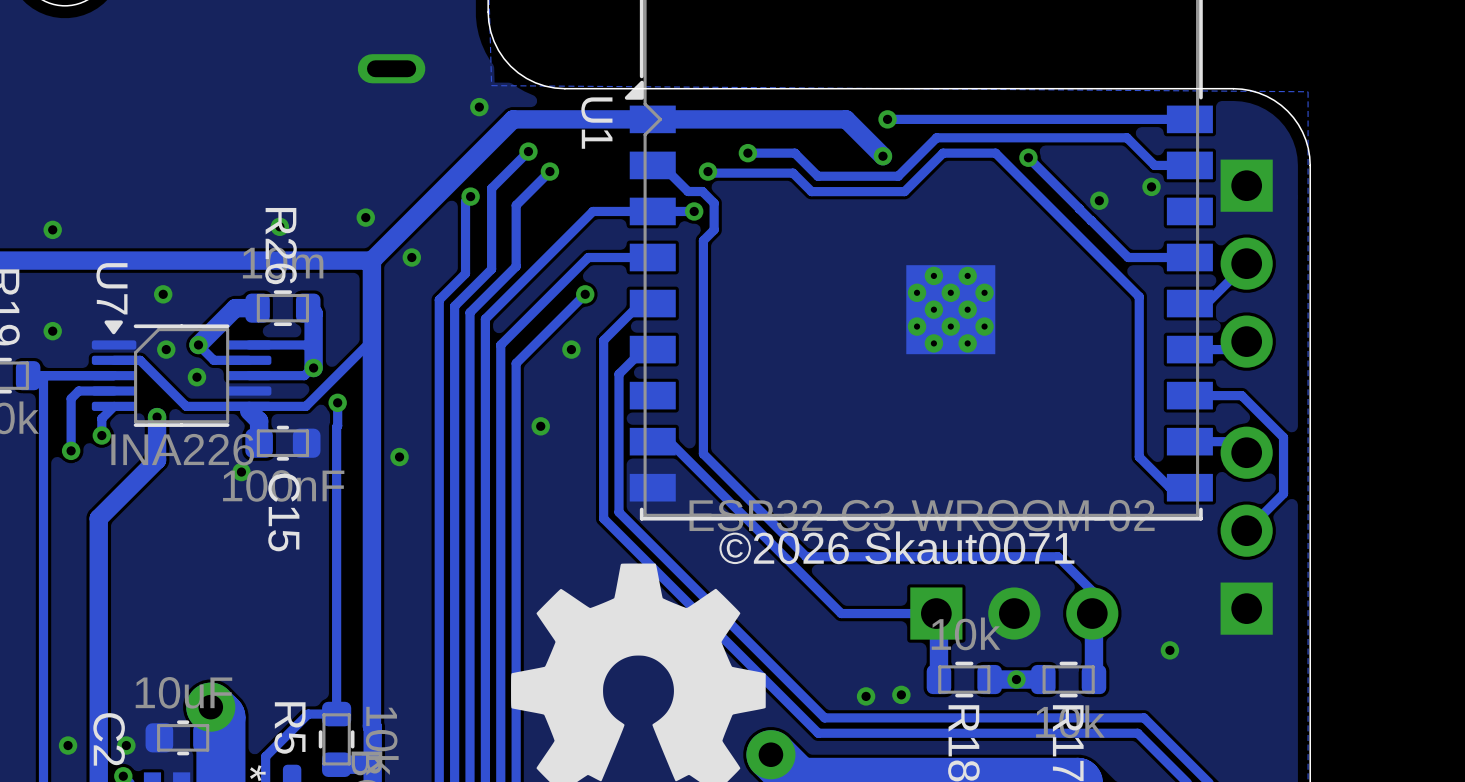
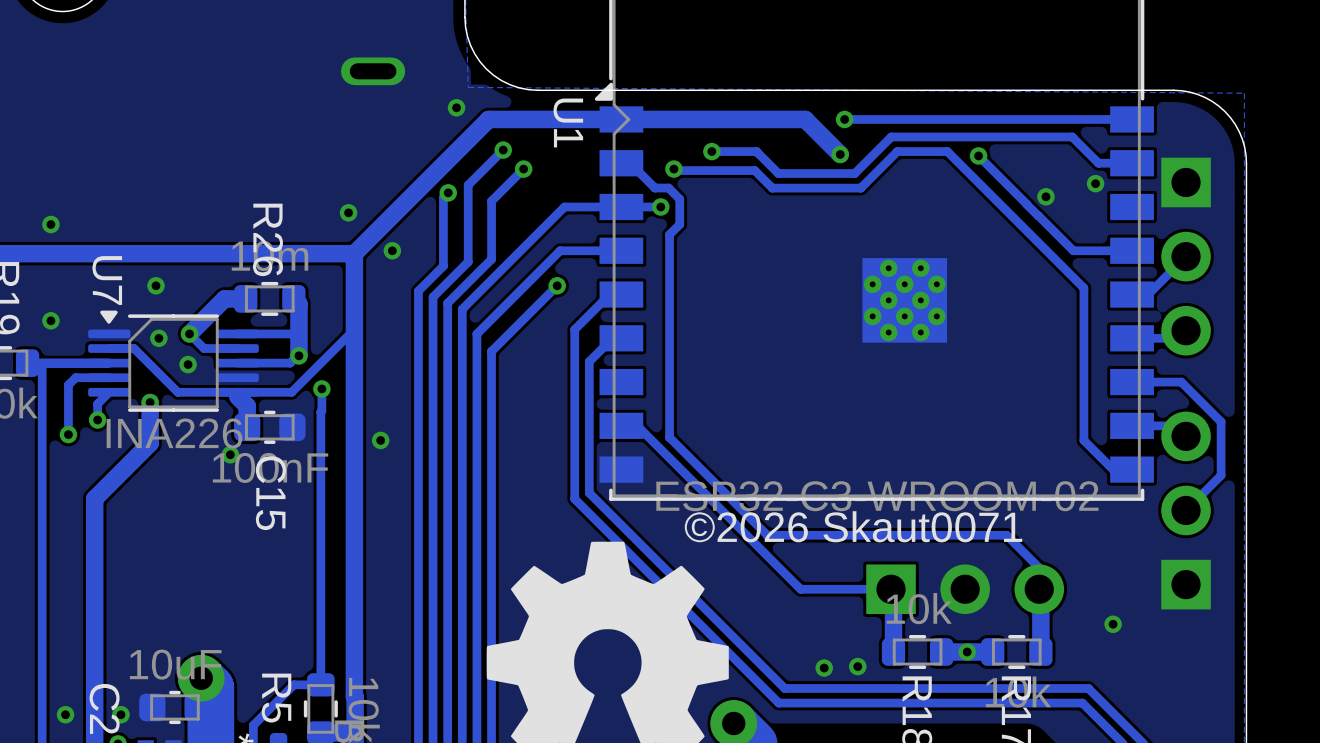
via: (279, 226) -> none
via: (571, 349) -> none
via: (540, 426) -> none

